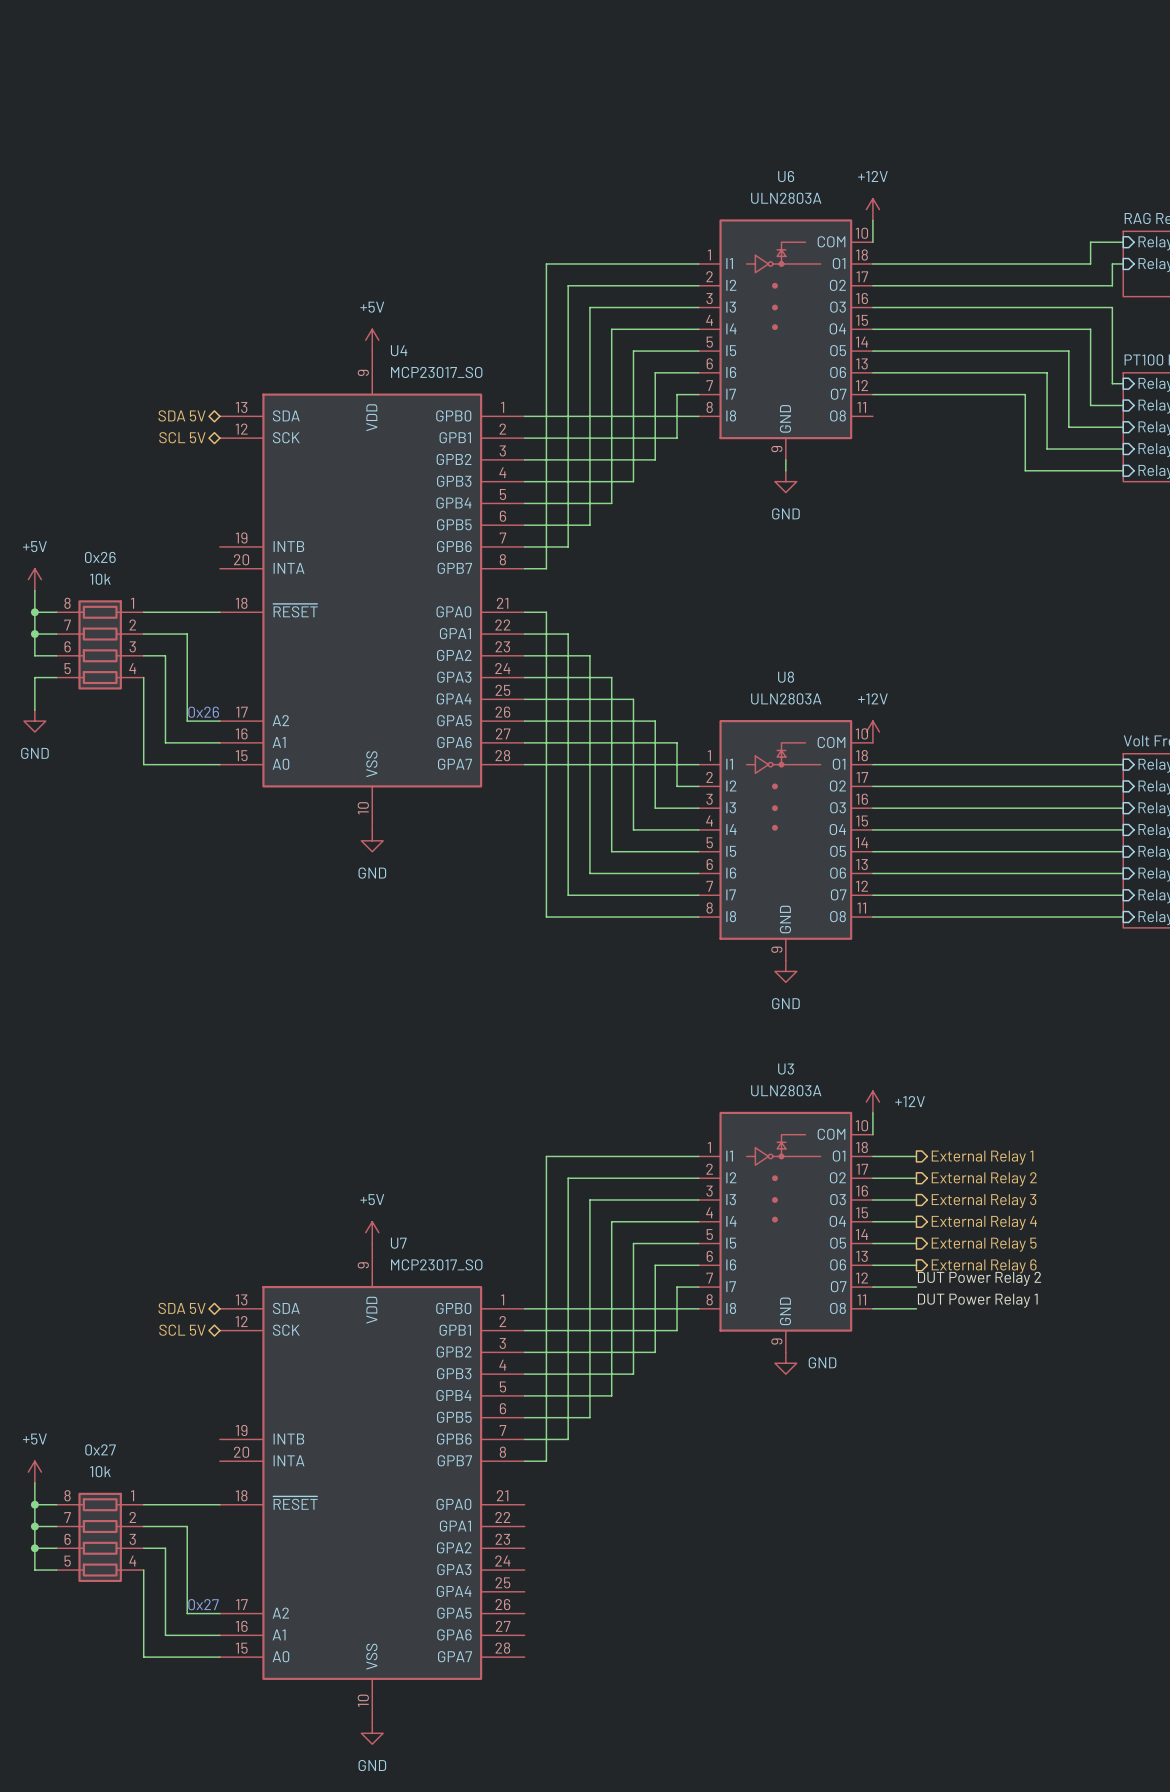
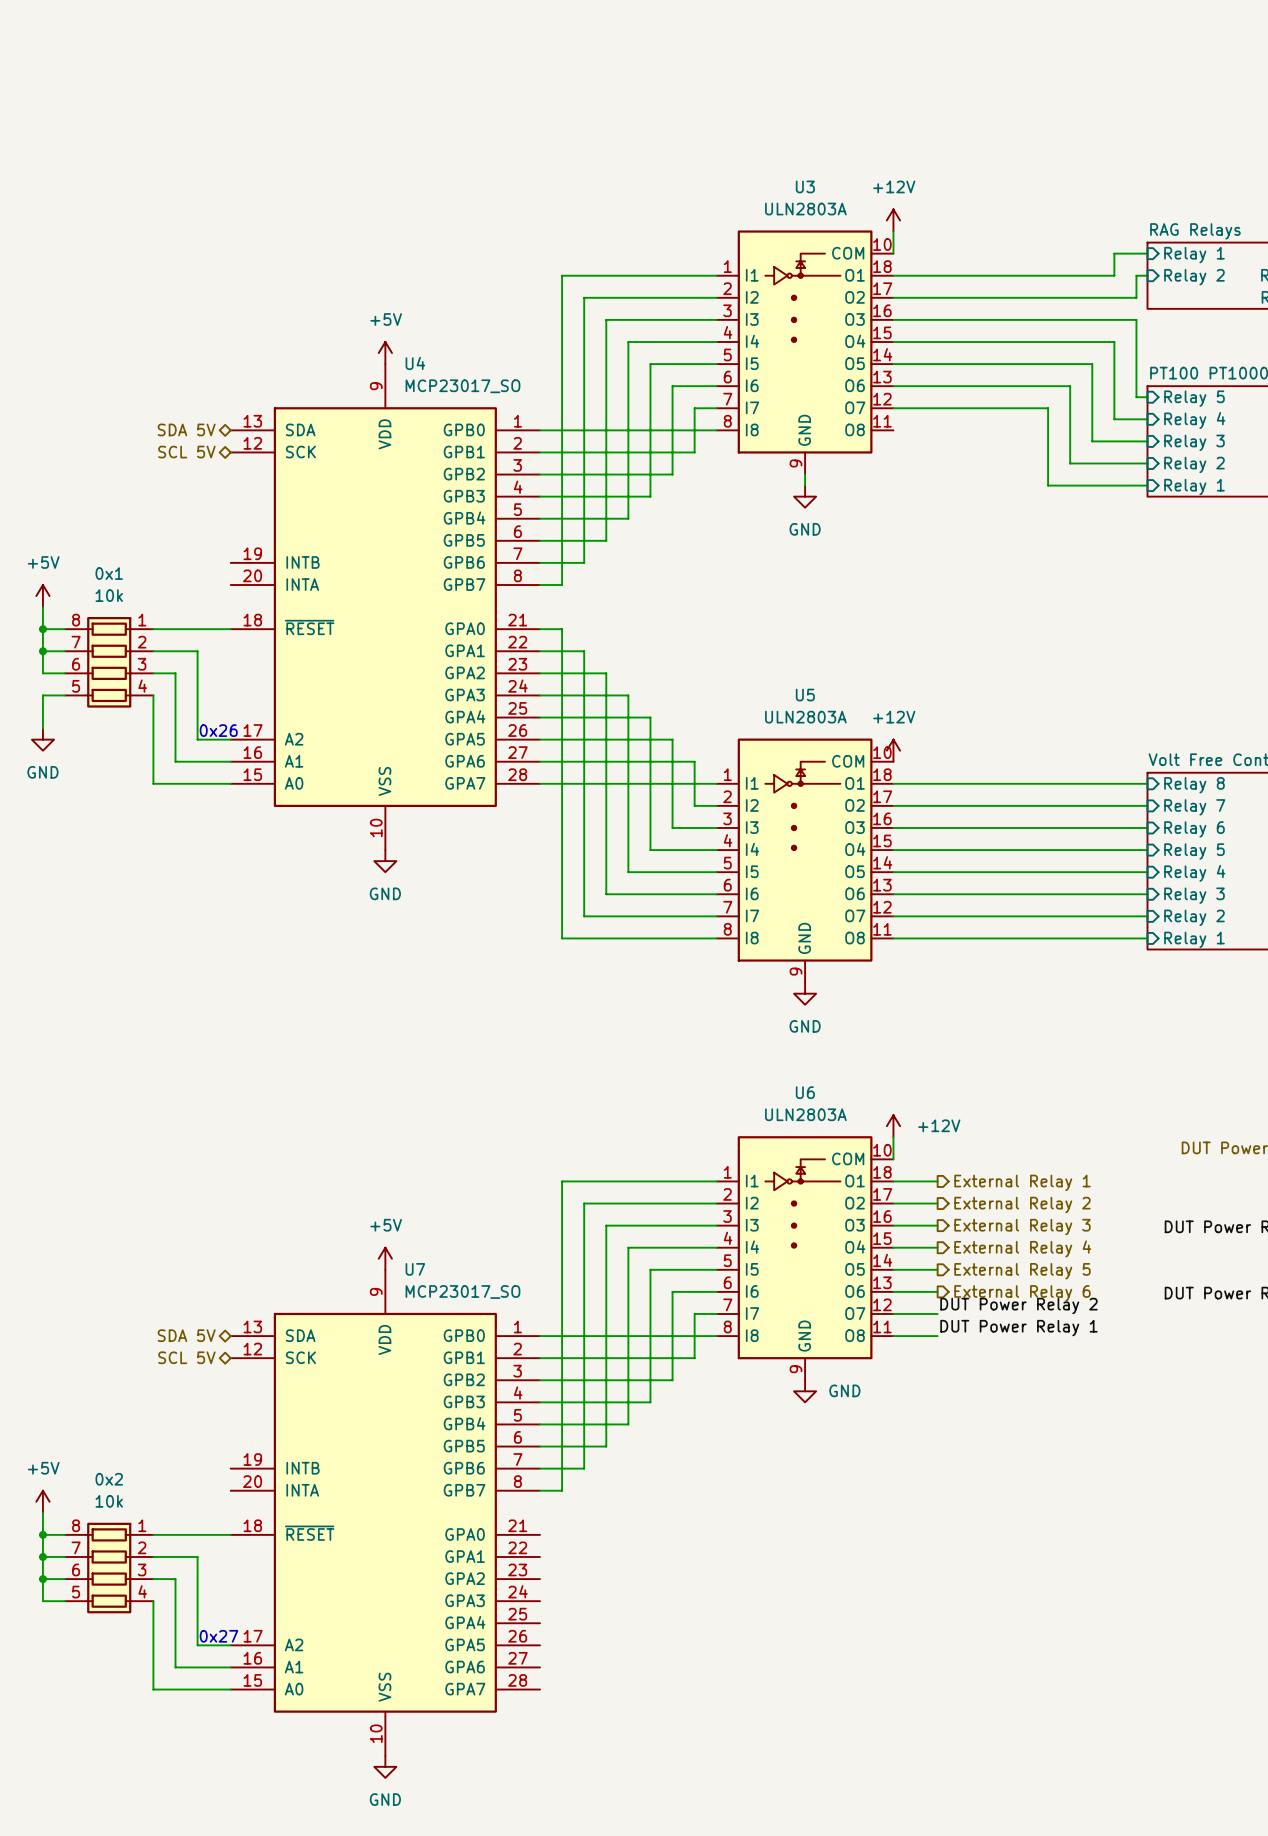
U6 name: U6 (786, 176) -> U3 (805, 186)
0x26 name: 0x26 (100, 557) -> 0x1 (109, 573)
U8 name: U8 (786, 677) -> U5 (805, 695)
U3 name: U3 (786, 1069) -> U6 (805, 1092)
0x27 name: 0x27 (100, 1449) -> 0x2 (109, 1479)

